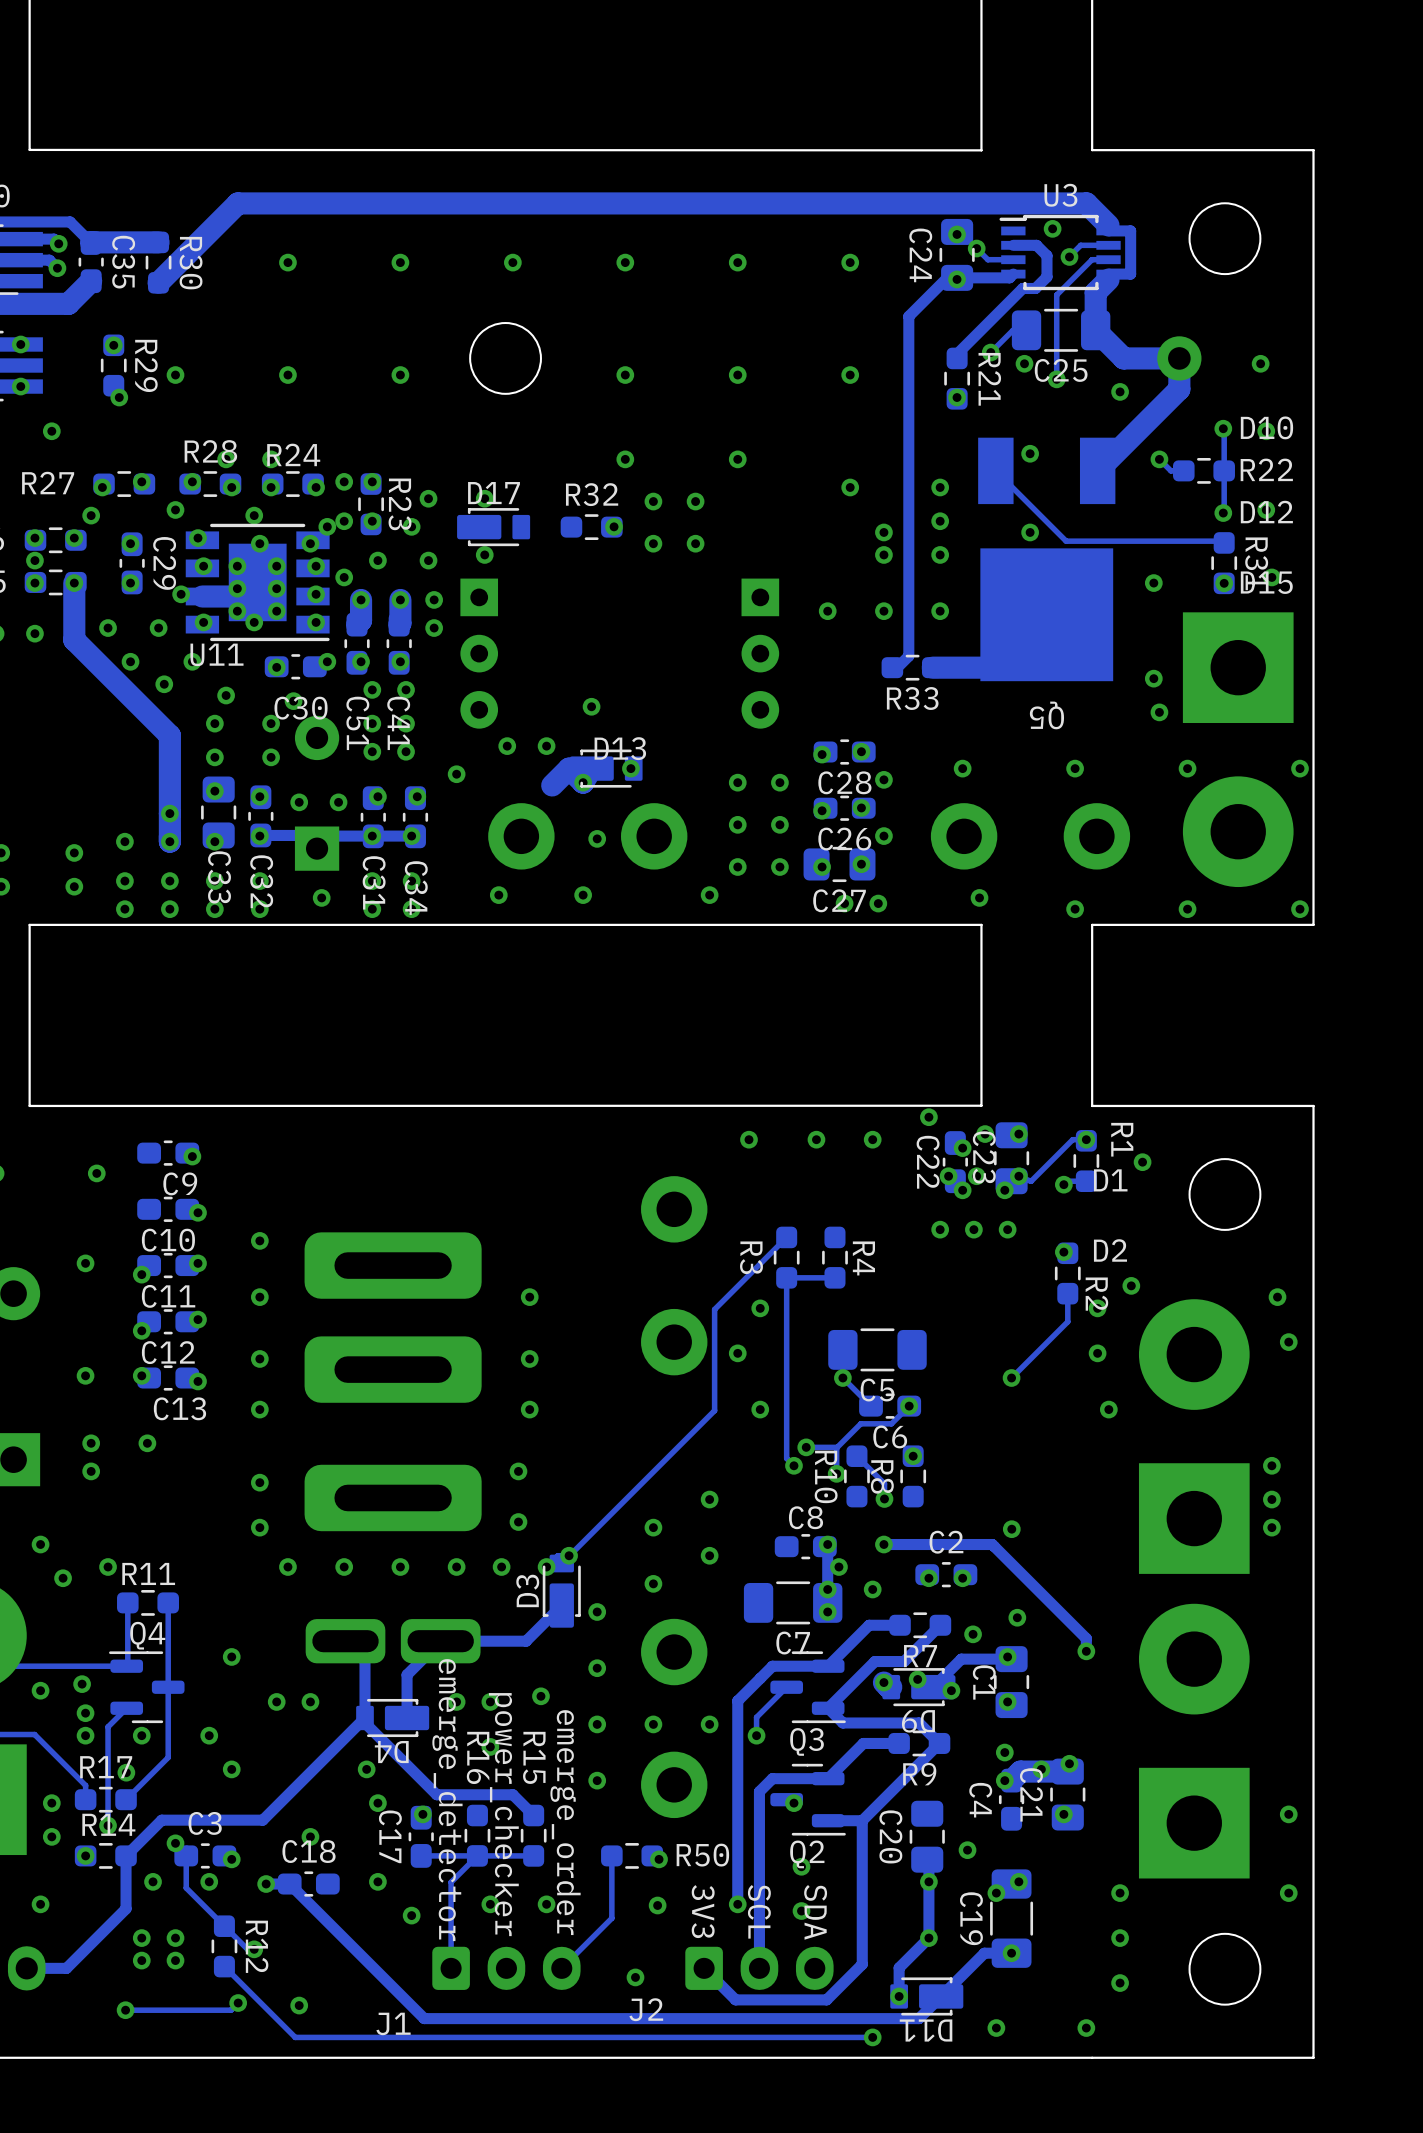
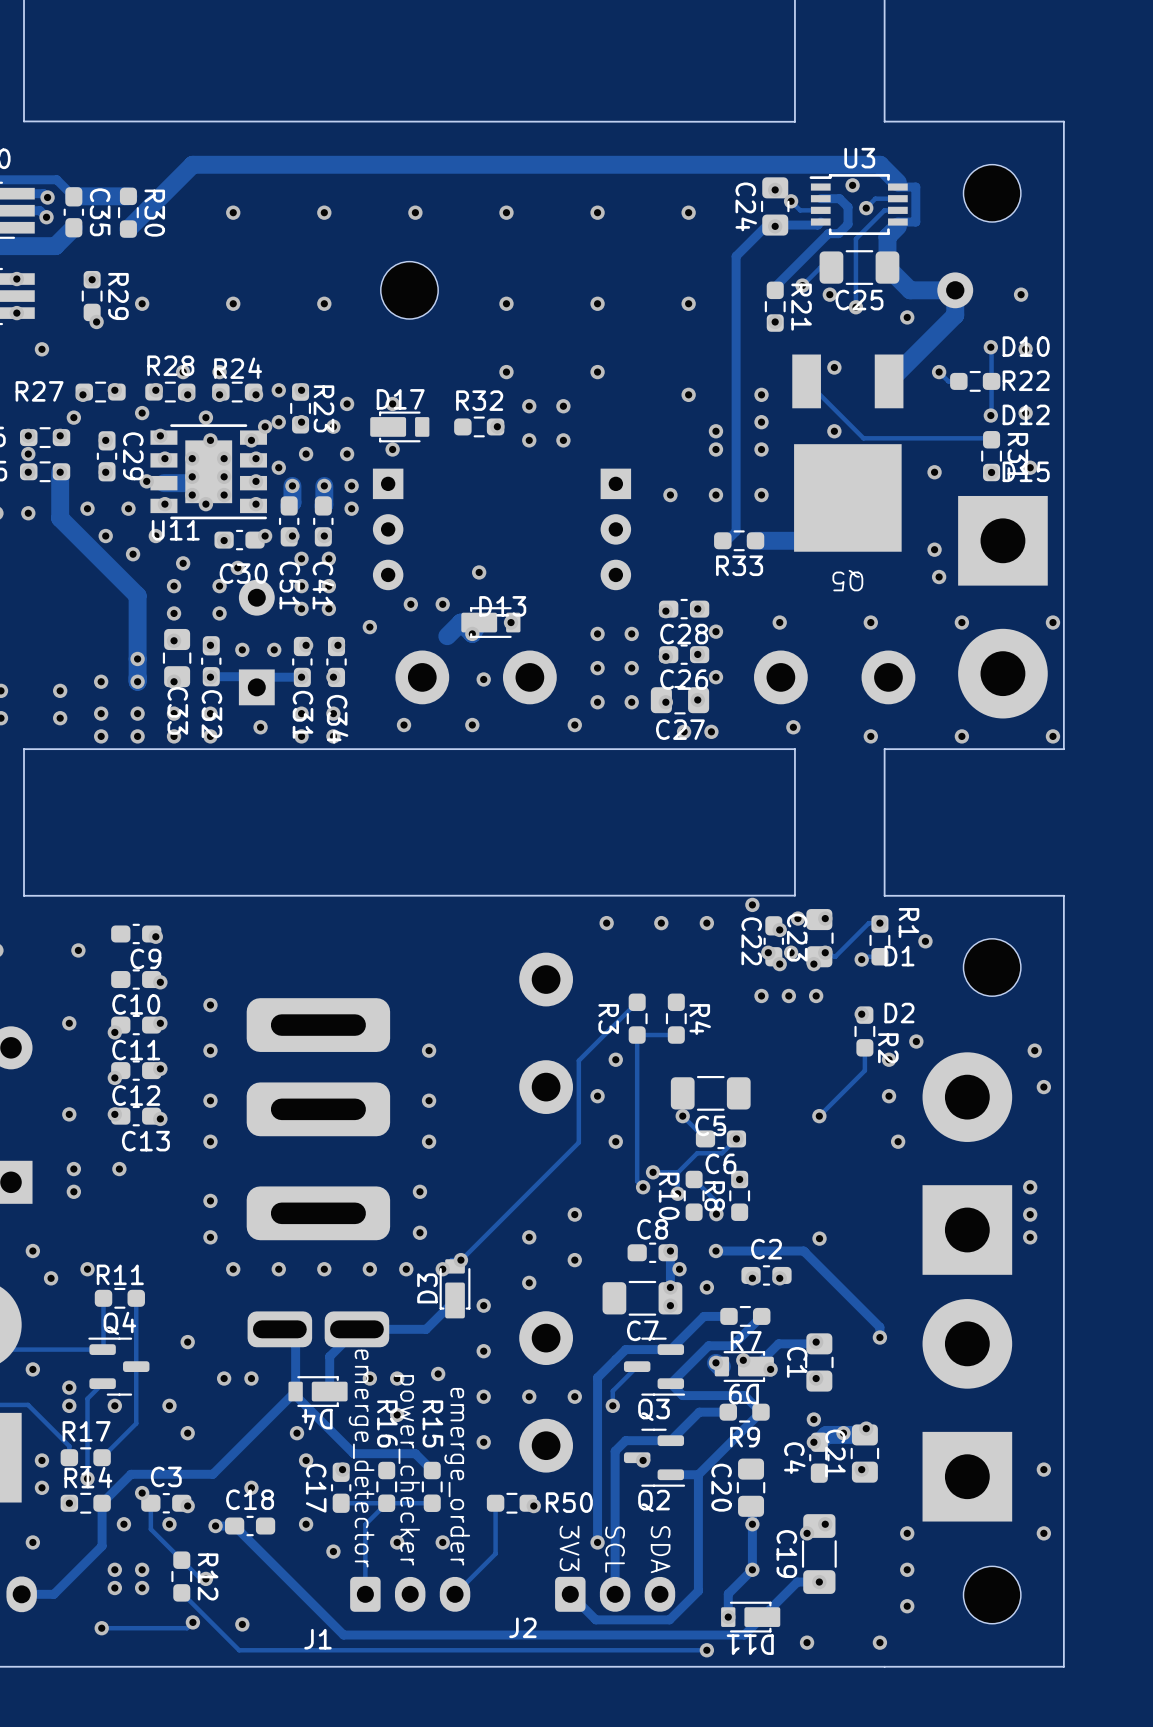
track: (415, 836) (372, 836) -> none
via: (1017, 1617) -> none
via: (973, 1634) -> none
via: (82, 1684) -> none
via: (126, 1772) -> none
via: (967, 1850) -> none
via: (801, 1866) -> none
via: (657, 1905) -> none
via: (801, 1911) -> none
via: (635, 1977) -> none

